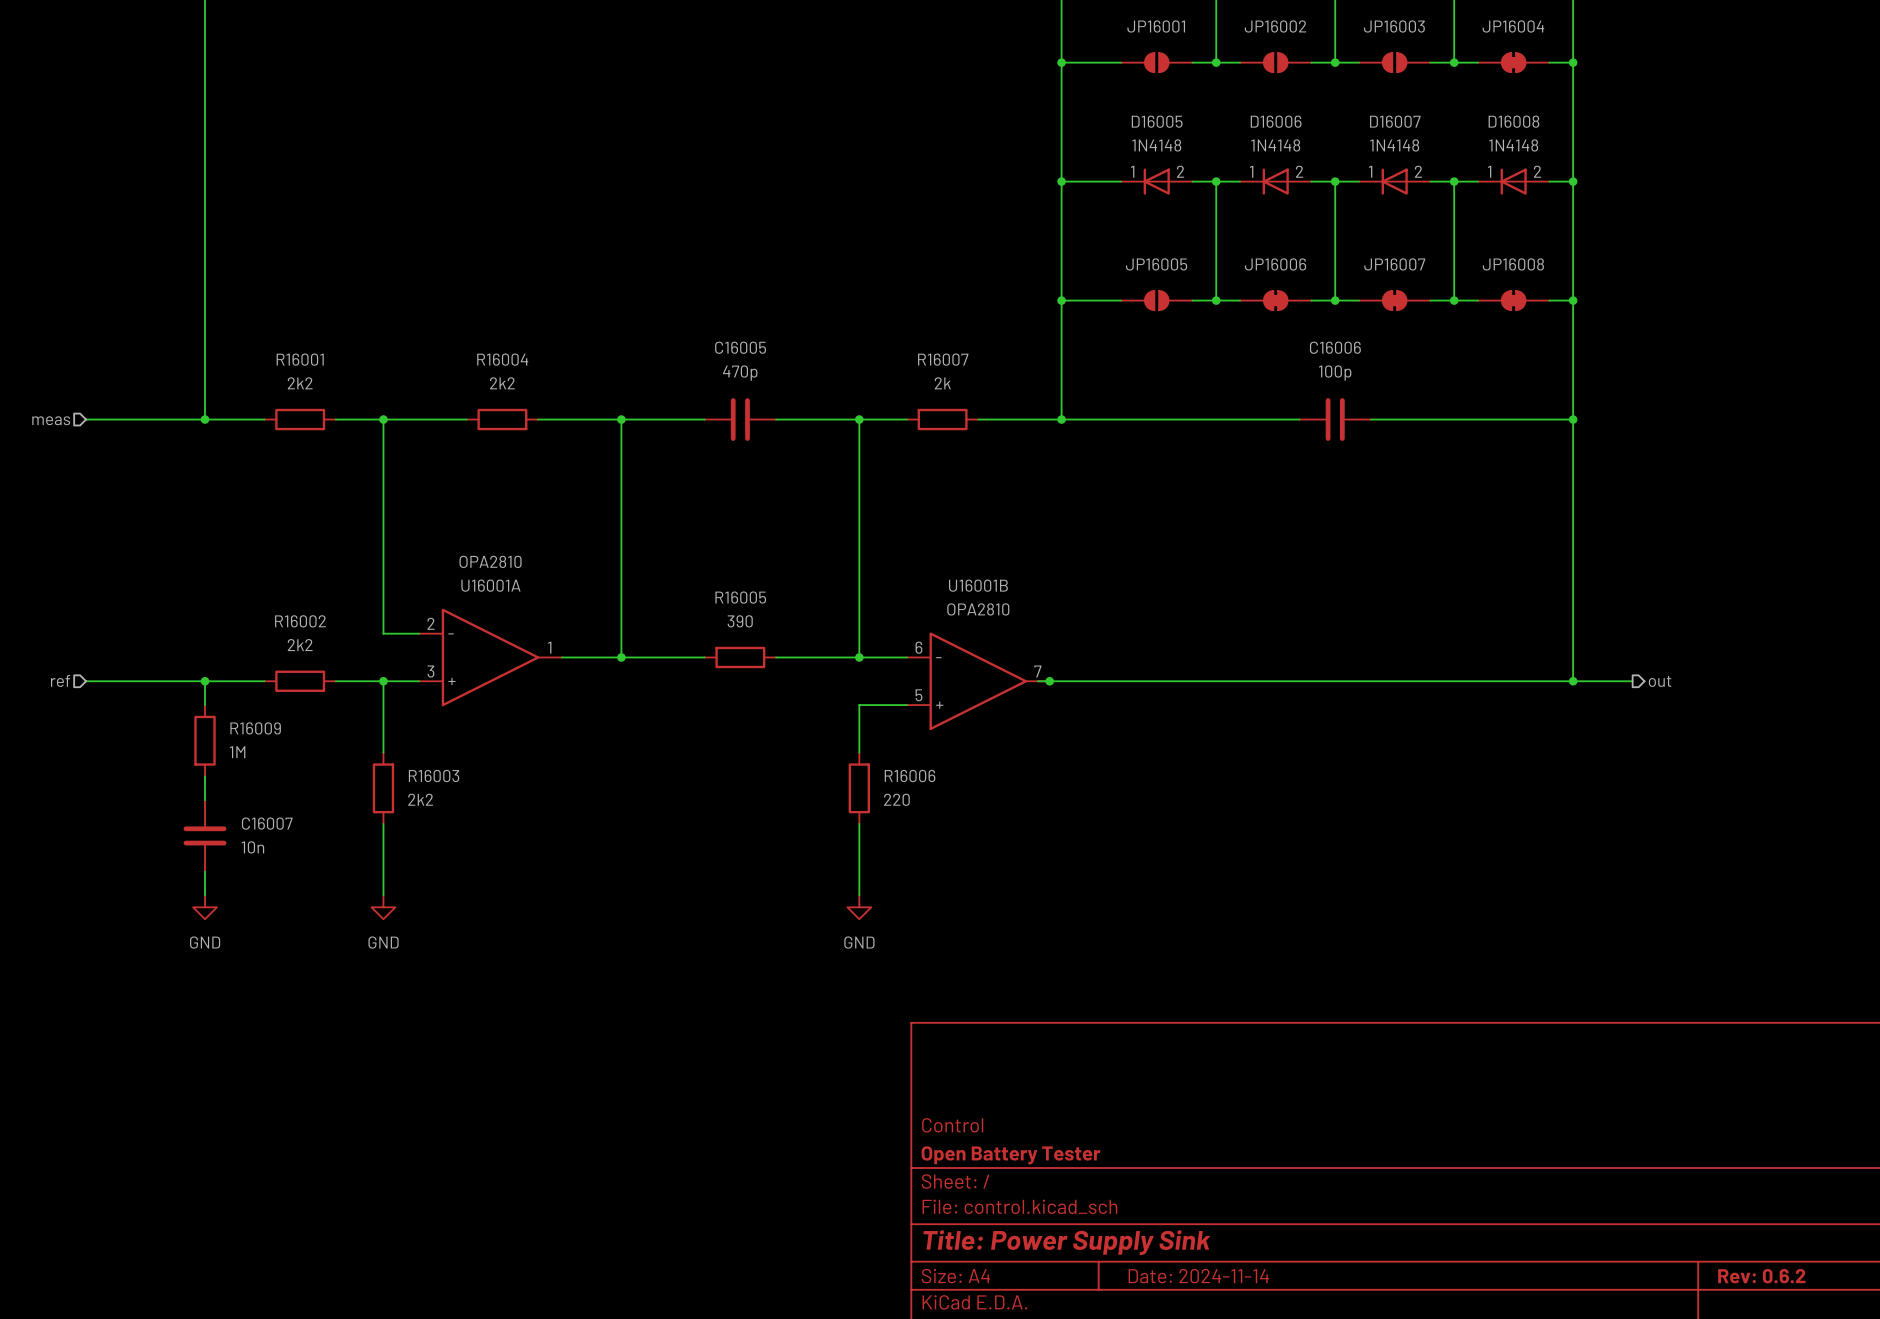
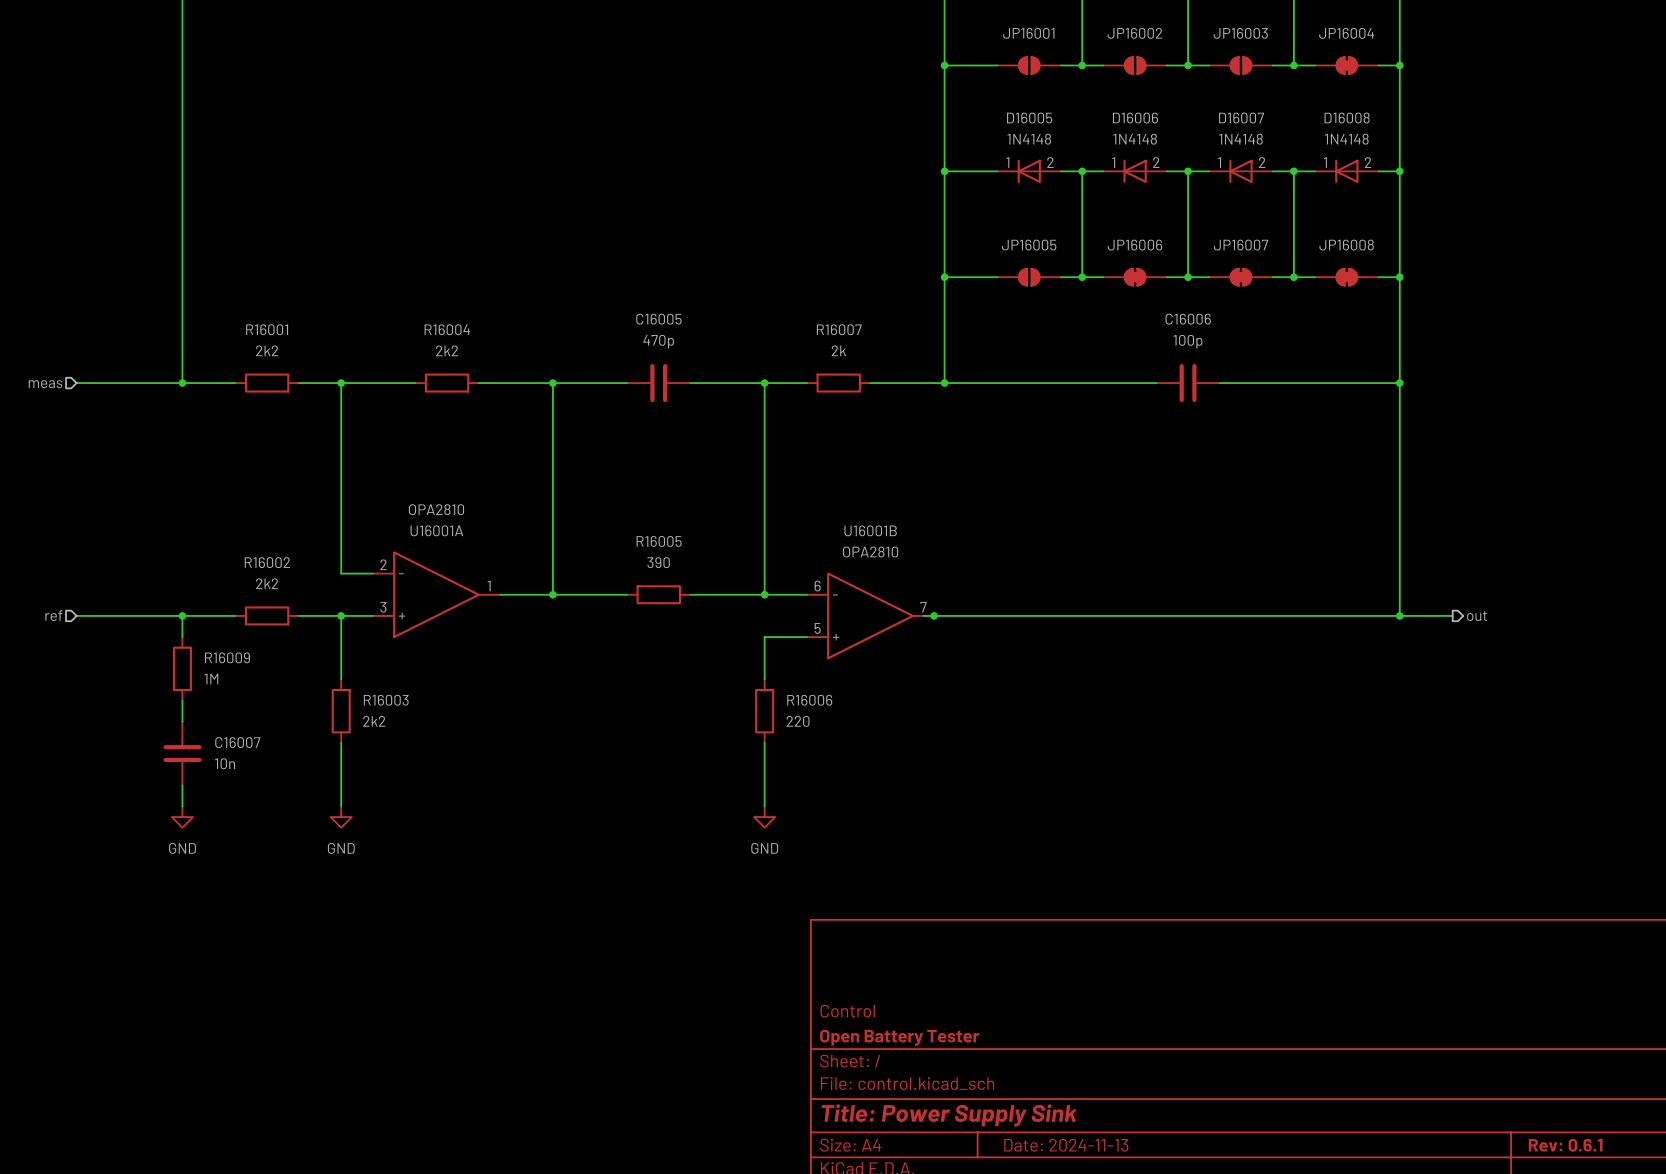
title block: Date: 2024-11-14 (1198, 1276) -> Date: 2024-11-13 (1066, 1145)
title block: Rev: 0.6.2 (1761, 1276) -> Rev: 0.6.1 (1565, 1145)

